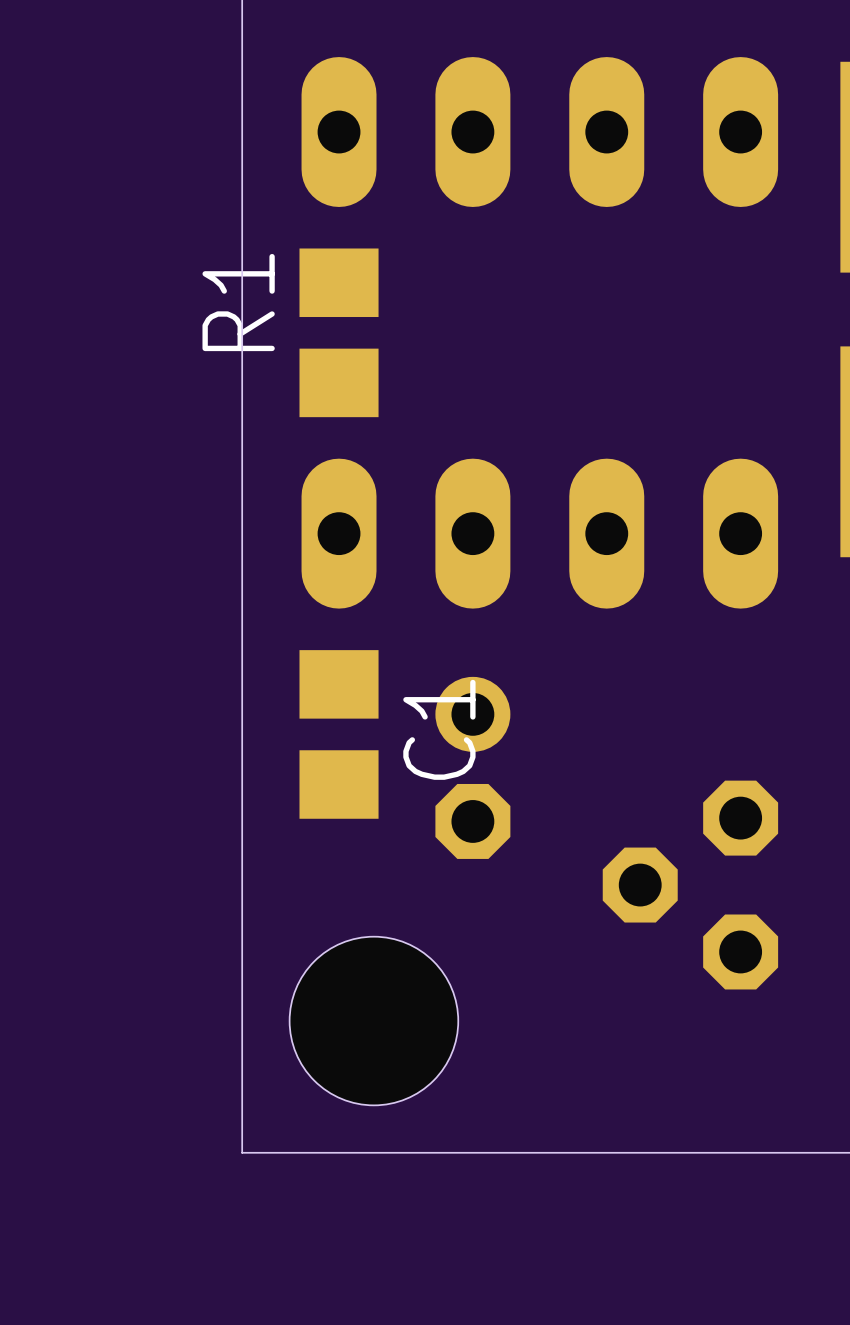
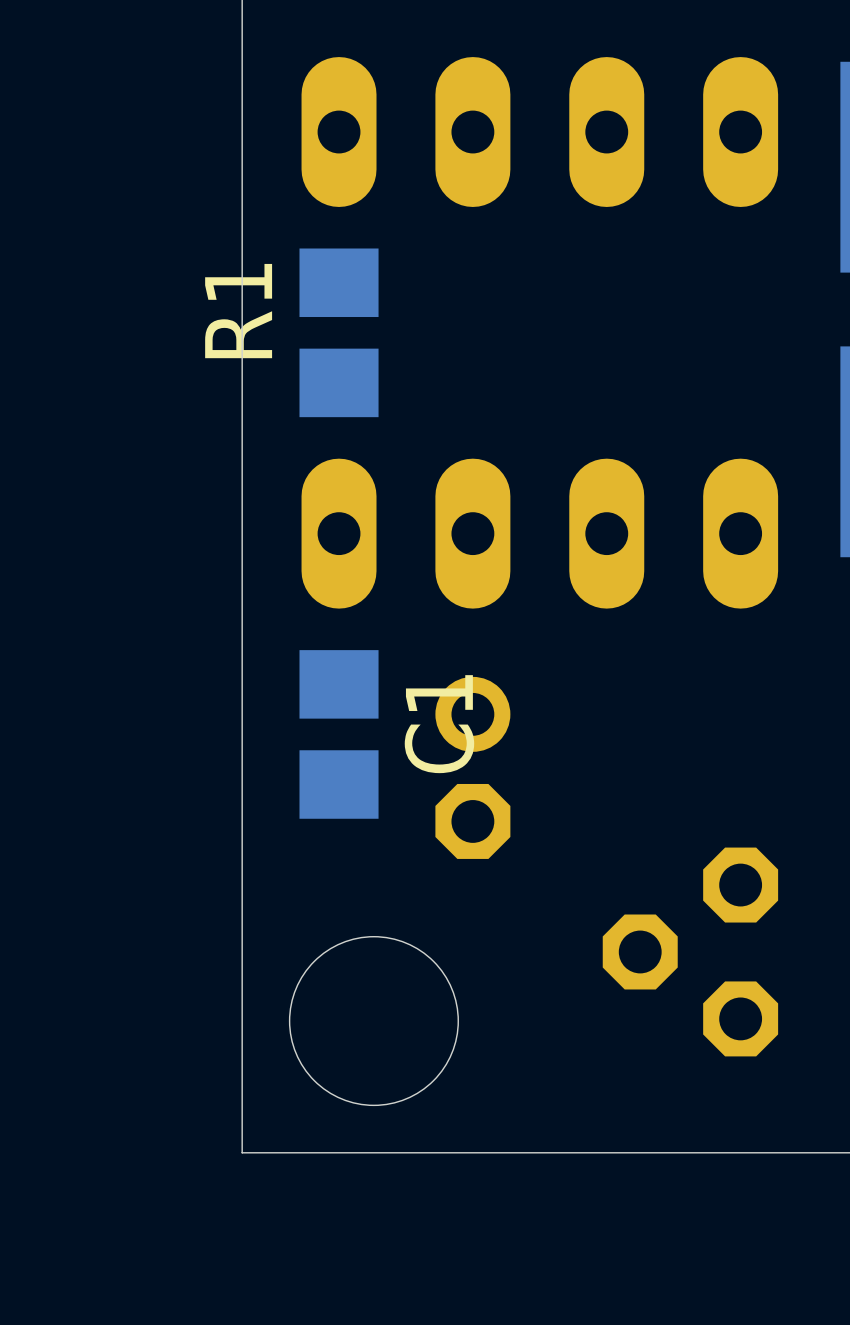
part position: (690, 885) -> (690, 951)

